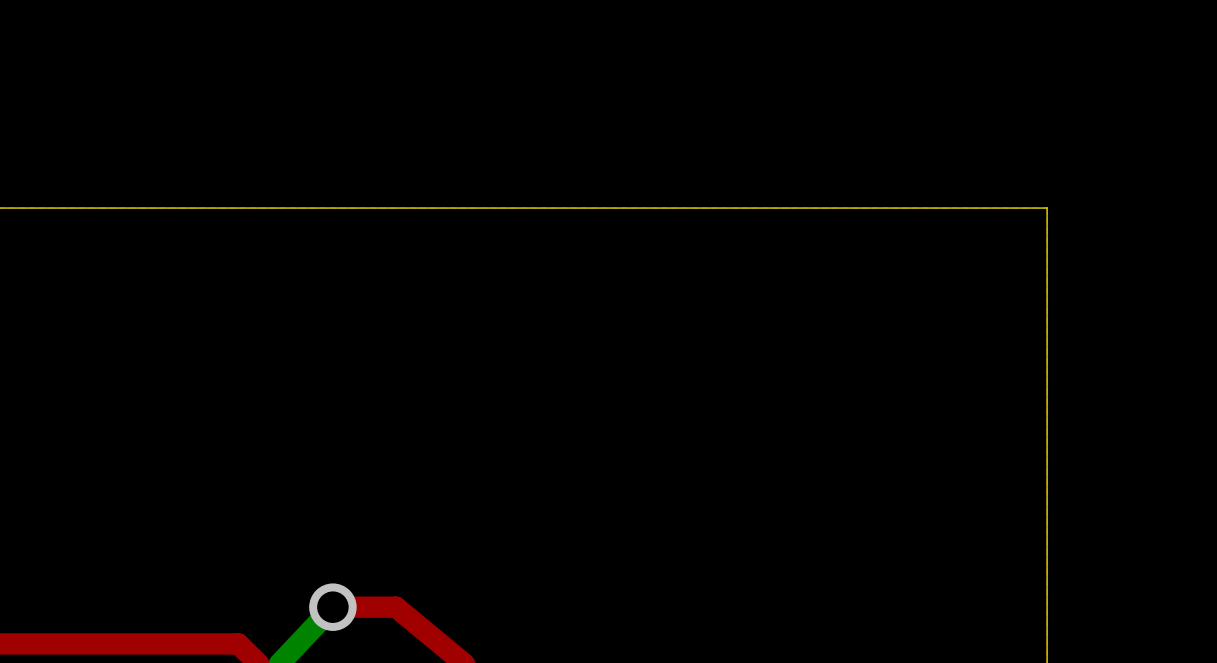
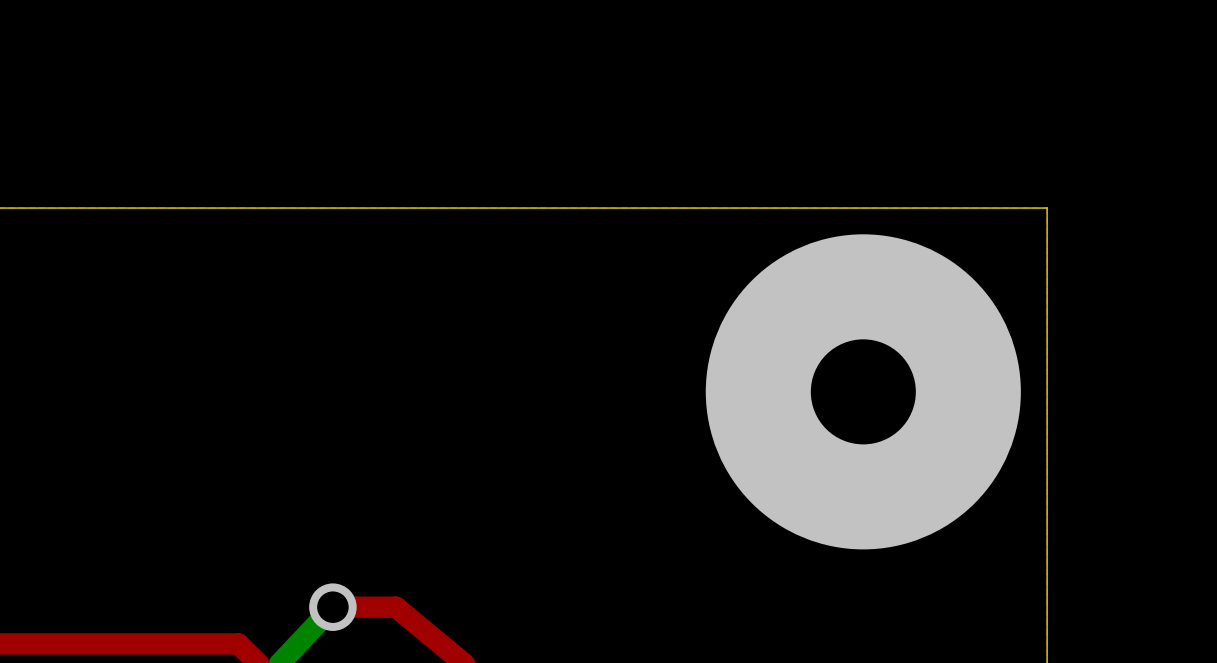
via: none -> (863, 391)

